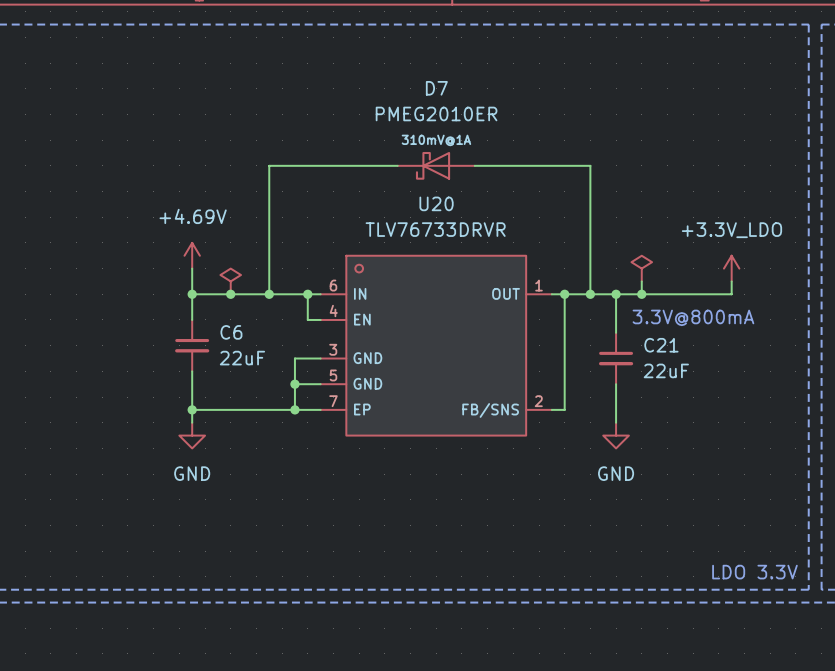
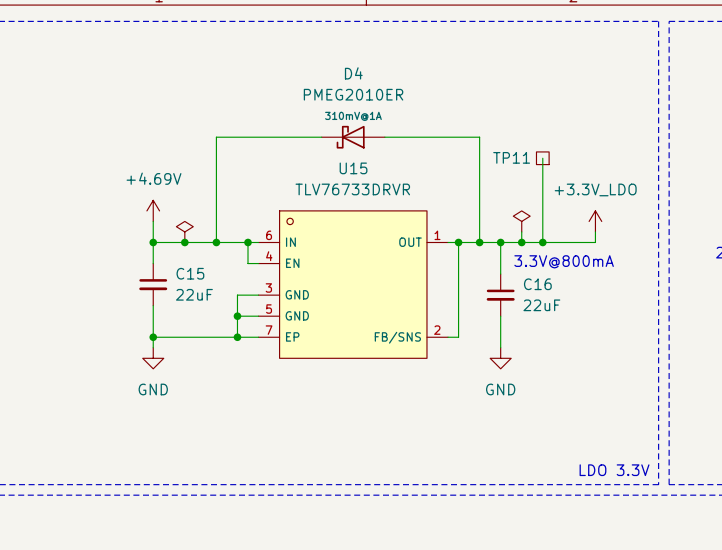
D7 name: D7 (436, 88) -> D4 (353, 73)
wire: none -> (542, 158) (542, 242)
TP11: none -> (542, 158)
U20 name: U20 (436, 203) -> U15 (353, 168)
junction: none -> (542, 242)
C6 name: C6 (231, 332) -> C15 (190, 273)
C21 name: C21 (661, 345) -> C16 (537, 284)

